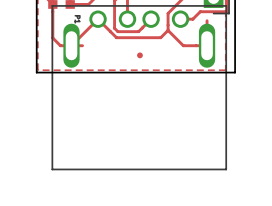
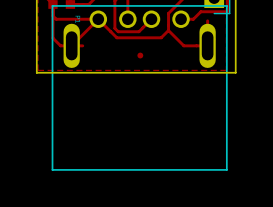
top track: none -> (53, 8) (53, 16) (56, 19) (98, 19)

